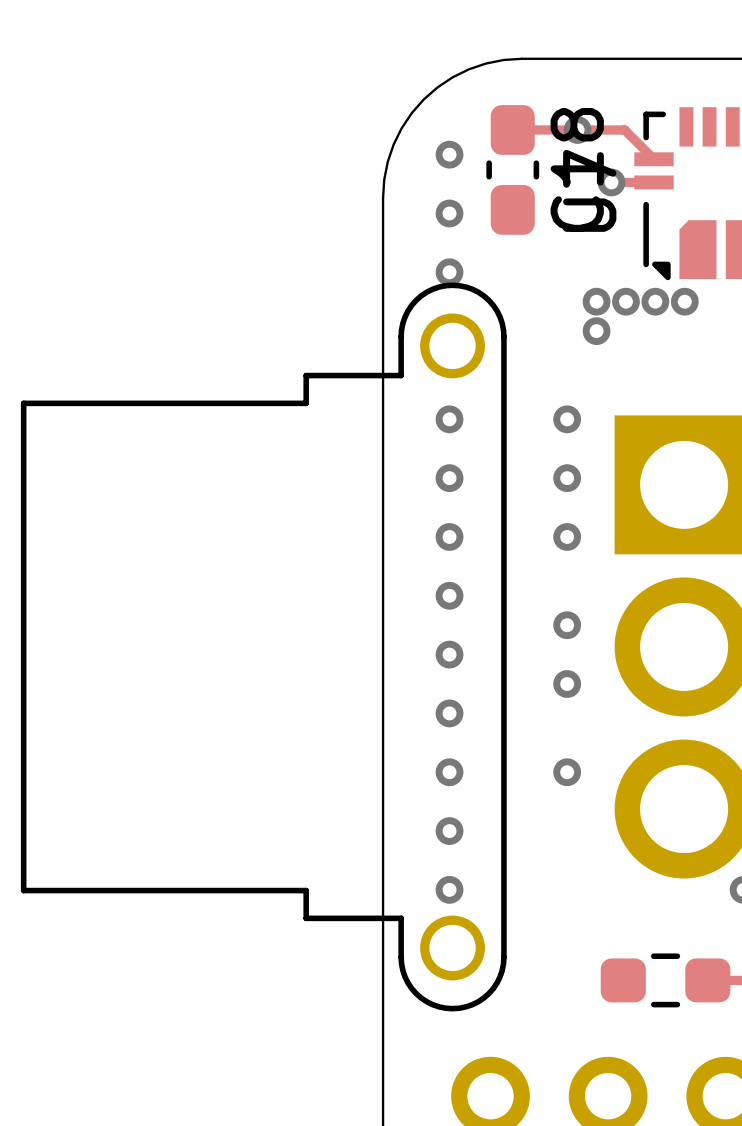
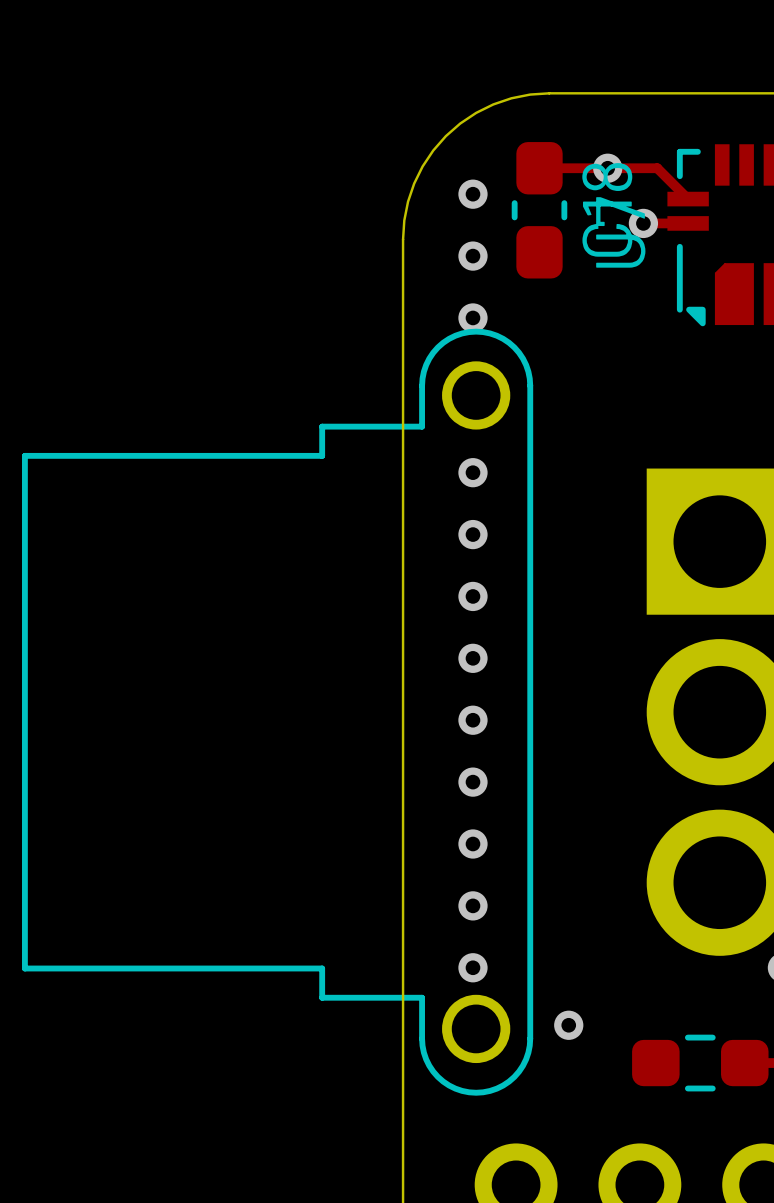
via: (596, 301) -> none
via: (625, 301) -> none
via: (655, 301) -> none
via: (684, 301) -> none
via: (596, 331) -> none
via: (567, 419) -> none
via: (567, 478) -> none
via: (567, 536) -> none
via: (567, 625) -> none
via: (567, 684) -> none
via: (567, 772) -> none
via: none -> (568, 1025)

